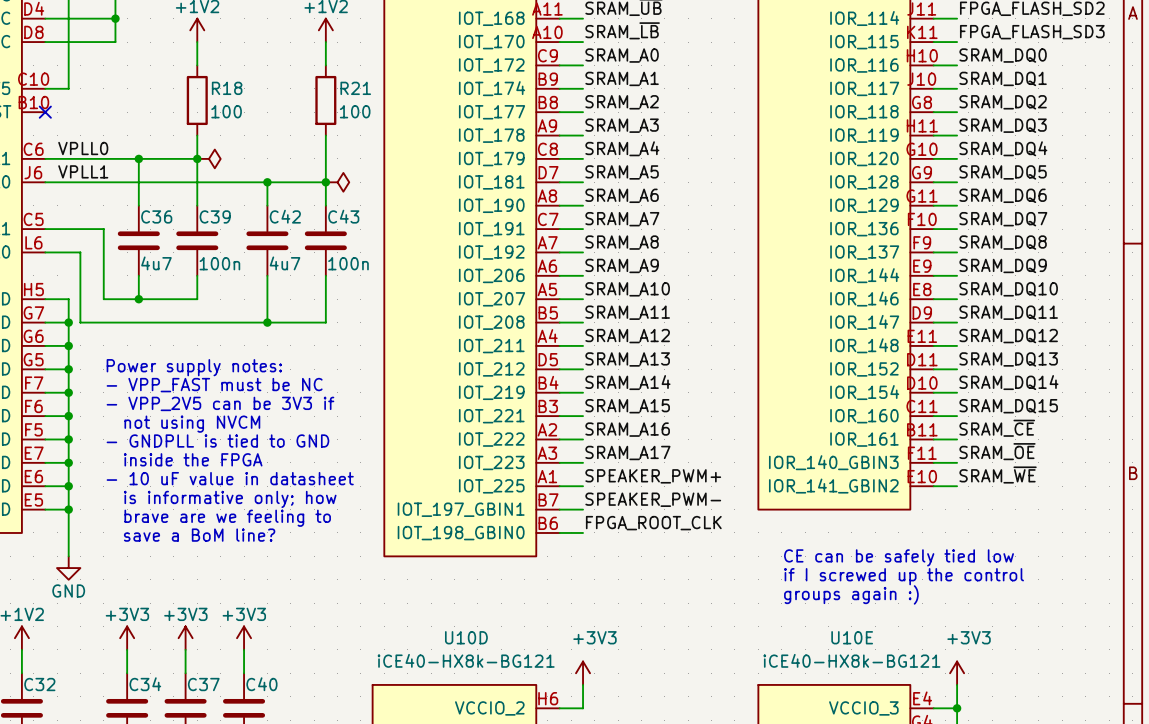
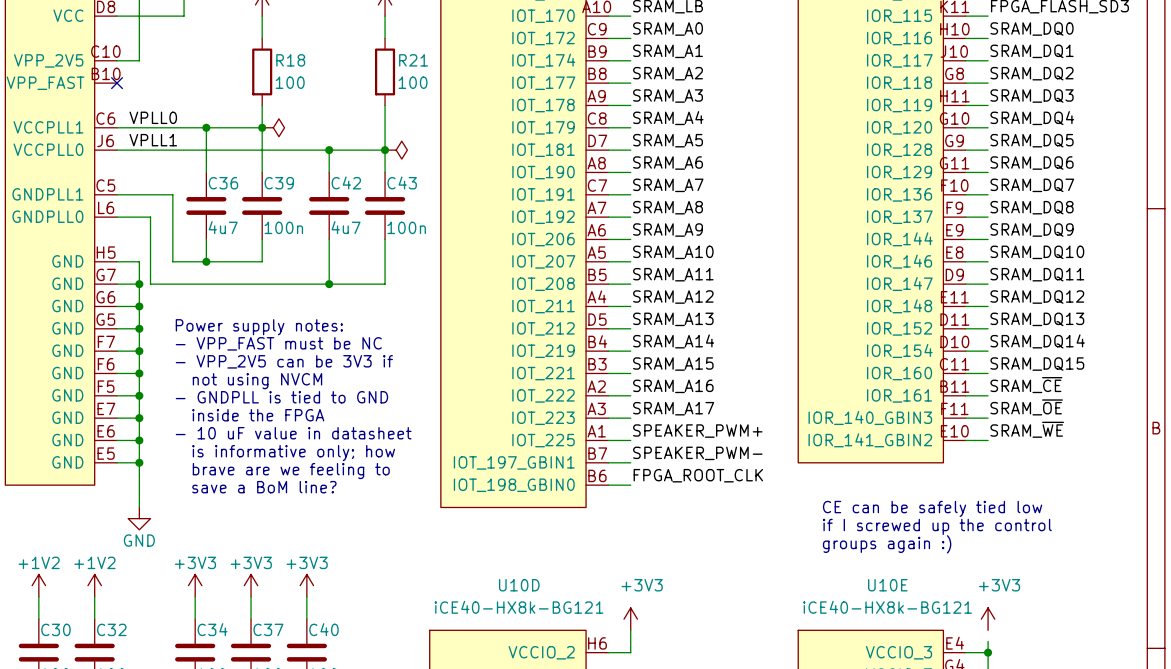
wire: (957, 684) (957, 696) -> none

